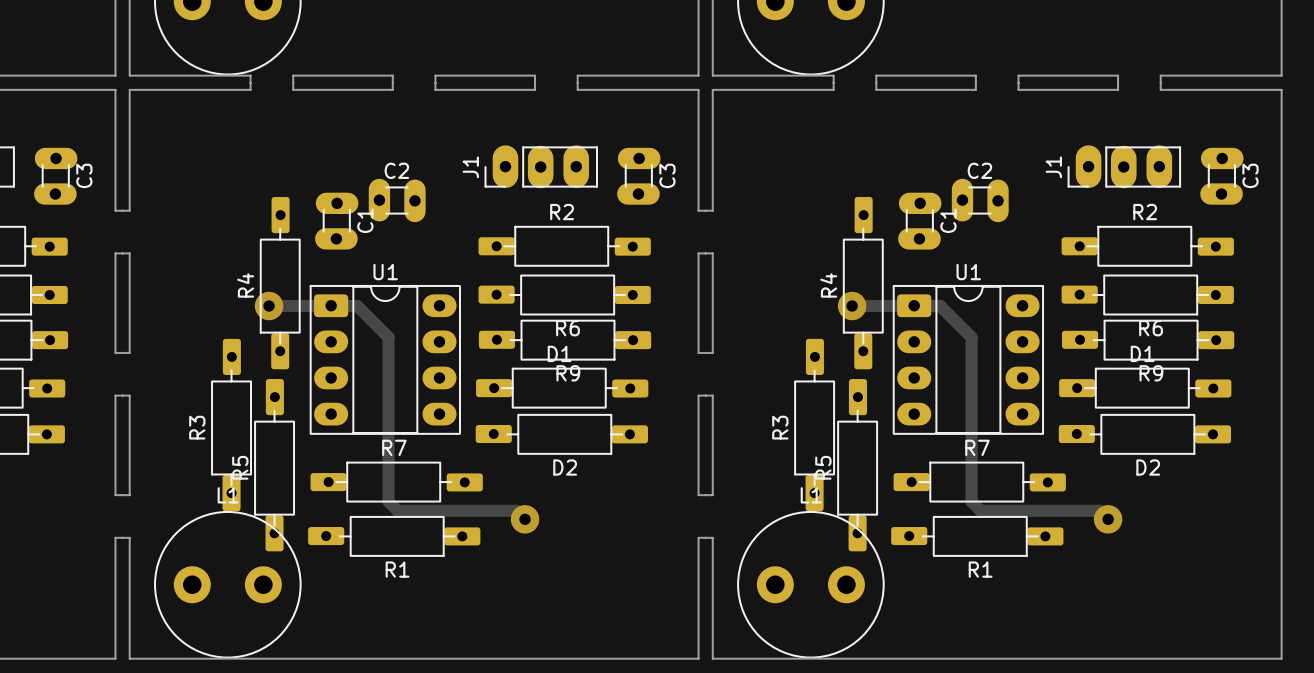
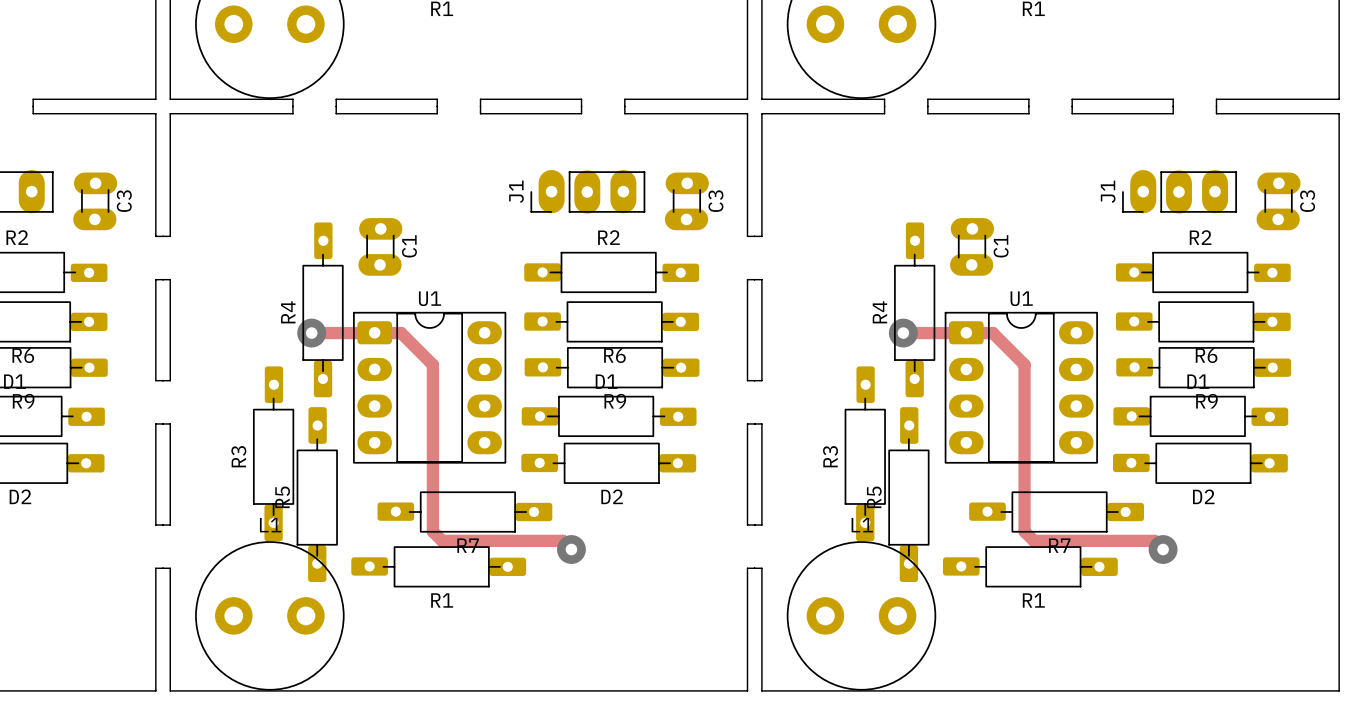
C2: (397, 200) -> none
C2: (980, 200) -> none
R7 rotation: 0° (396, 482) -> 180° (464, 512)
R7 rotation: 0° (979, 482) -> 180° (1056, 512)

